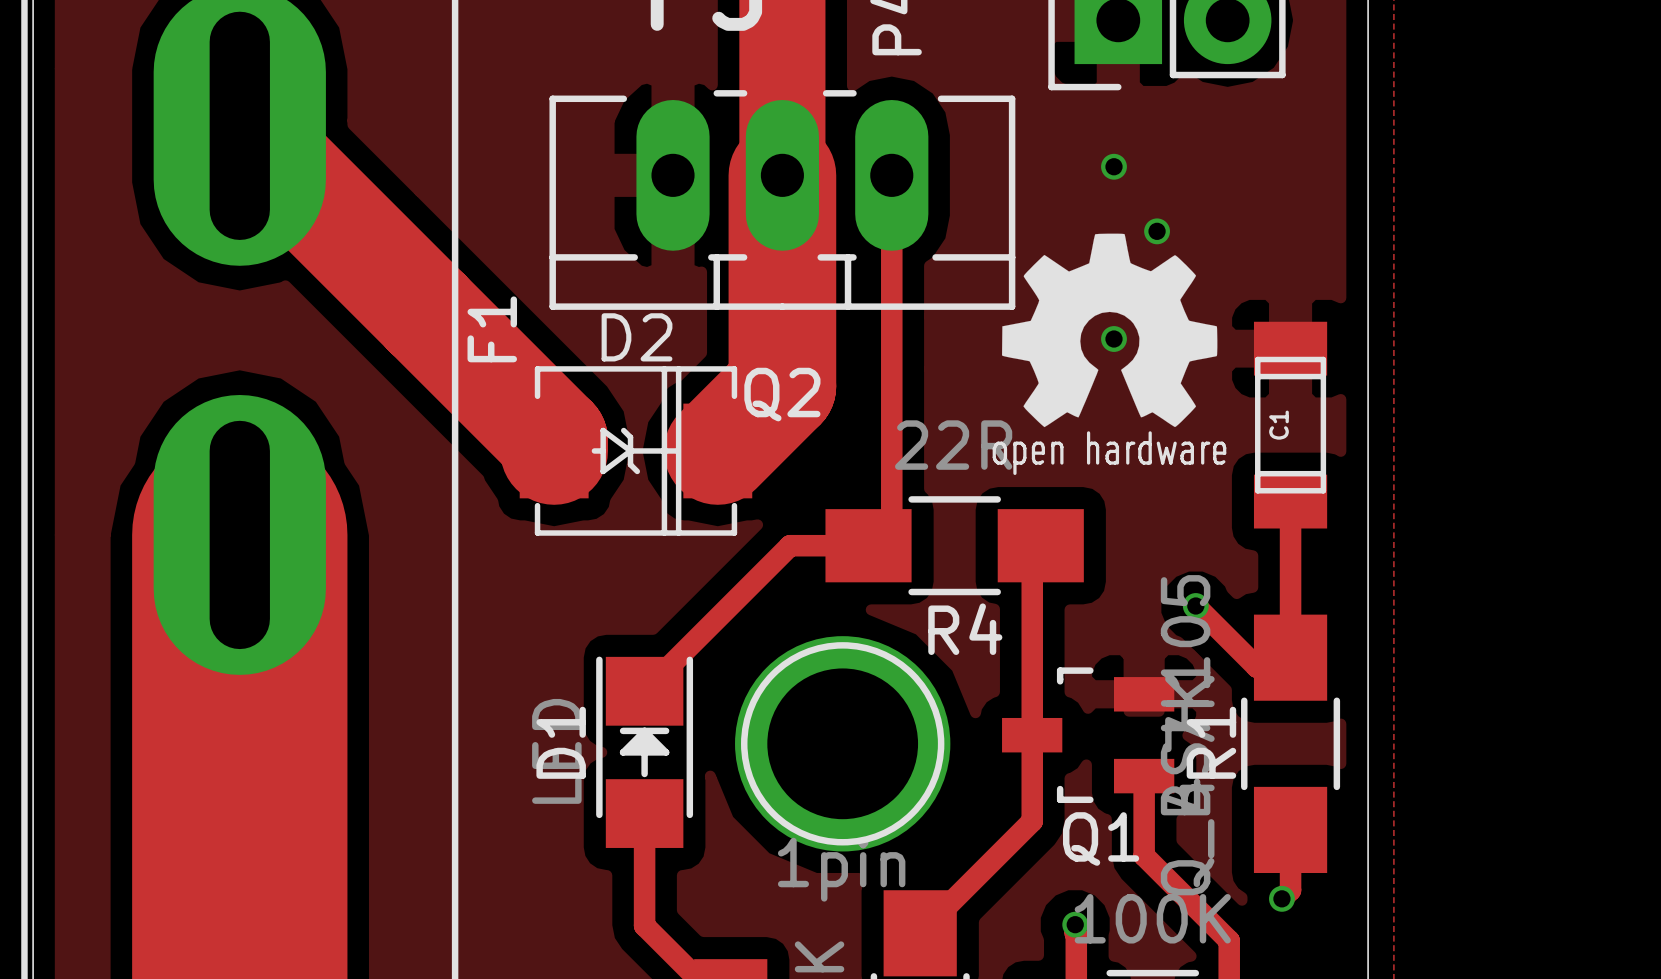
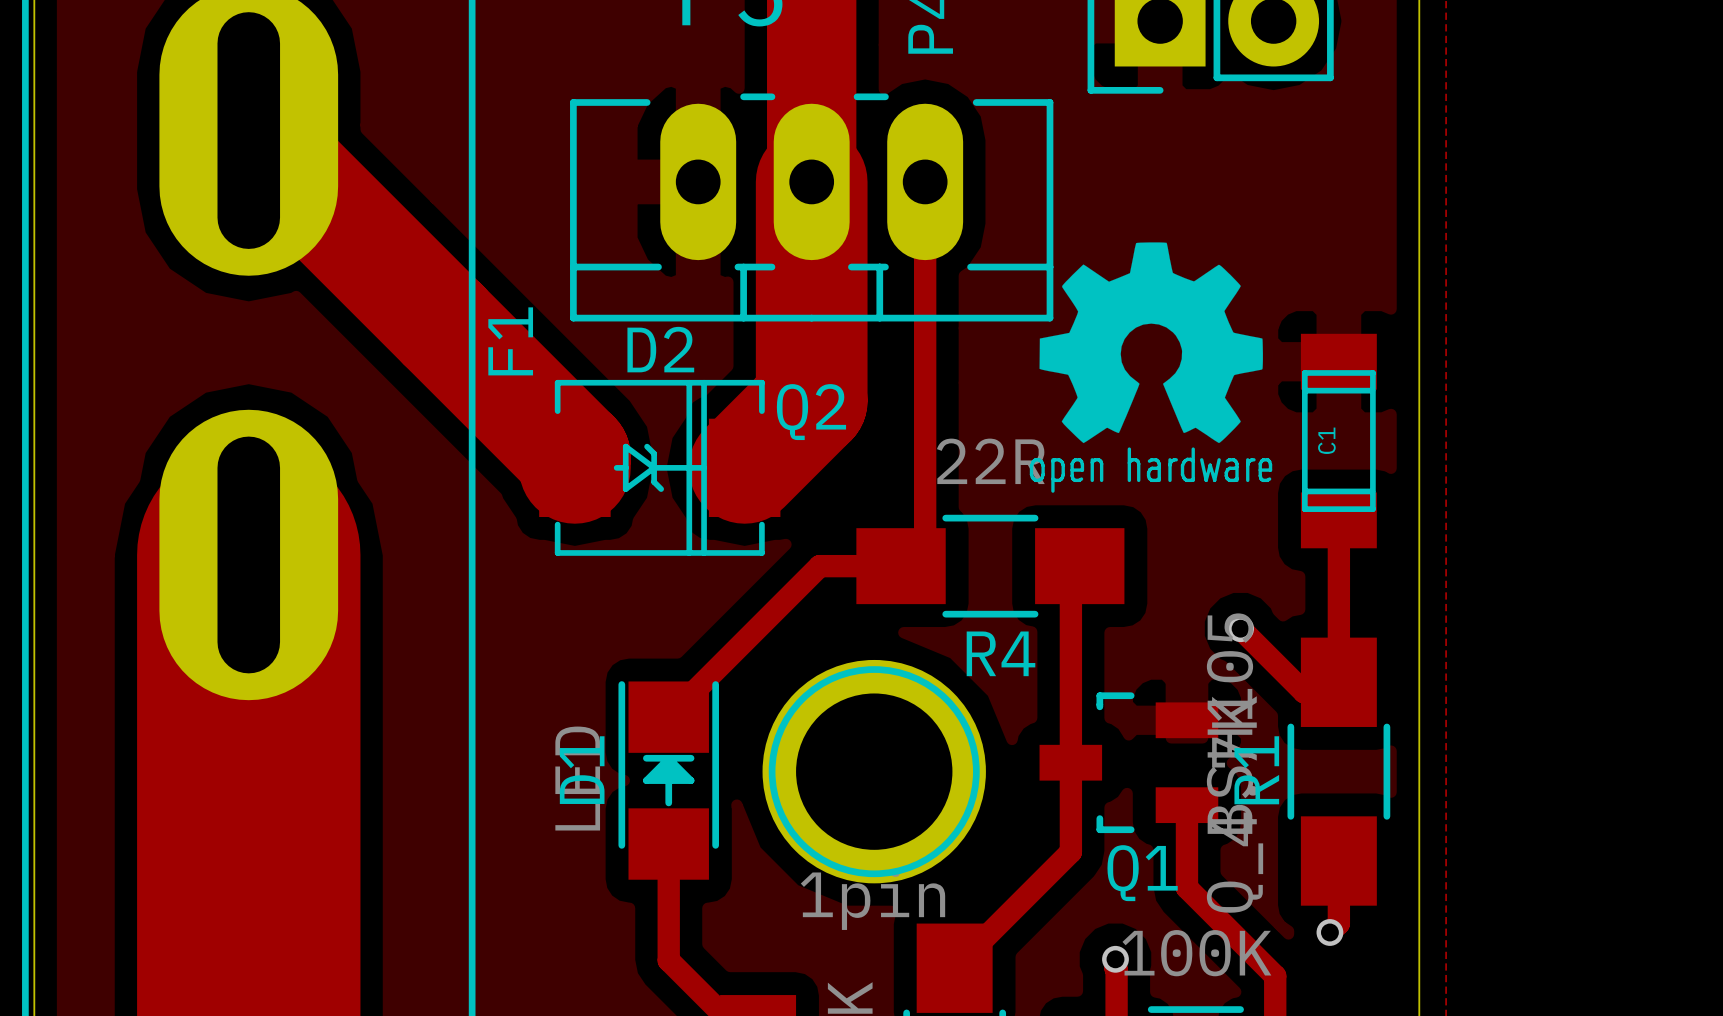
part: (1113, 166) -> none
part: (1157, 231) -> none
part: (1113, 339) -> none

